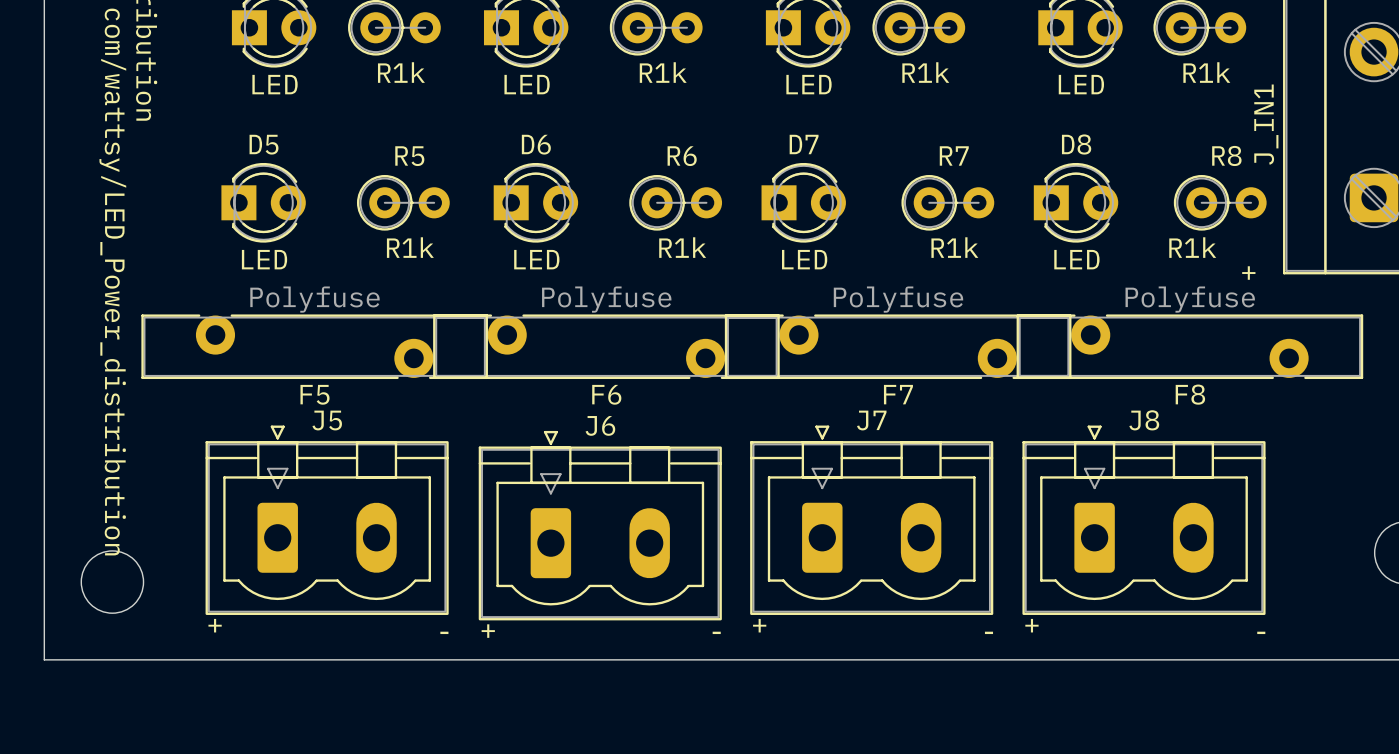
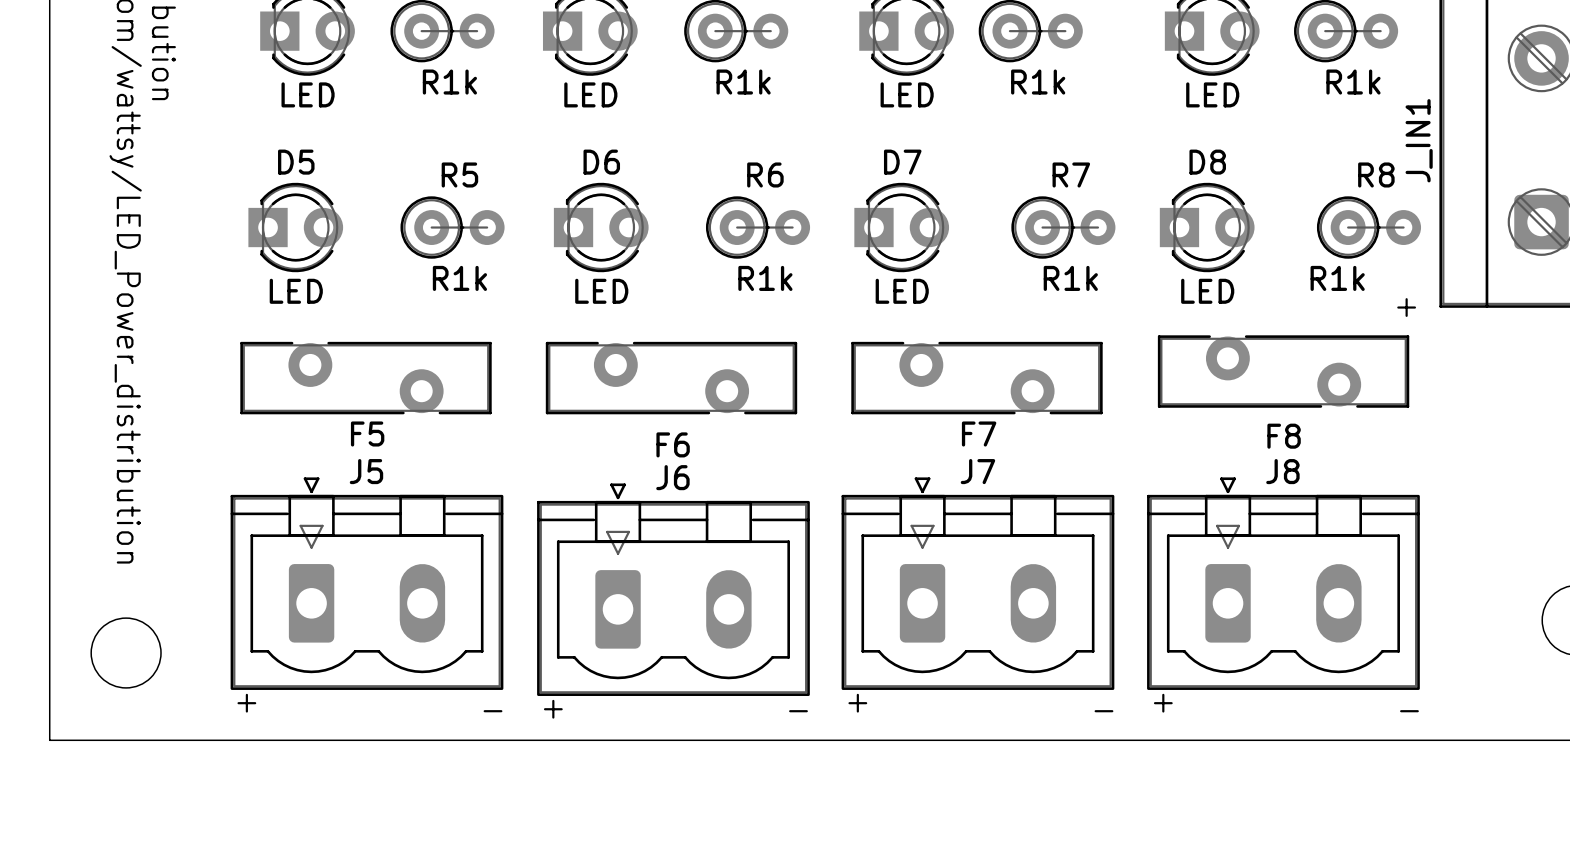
F5 value: Polyfuse (314, 299) -> none
F6 value: Polyfuse (606, 299) -> none
F7 value: Polyfuse (898, 299) -> none
F8 value: Polyfuse (1190, 299) -> none
F5 footprint: [141, 314, 488, 380] -> [240, 341, 492, 415]
F6 footprint: [433, 314, 780, 380] -> [545, 341, 798, 415]
F7 footprint: [724, 314, 1072, 380] -> [851, 341, 1103, 415]
F8 footprint: [1016, 314, 1364, 380] -> [1157, 335, 1410, 408]

